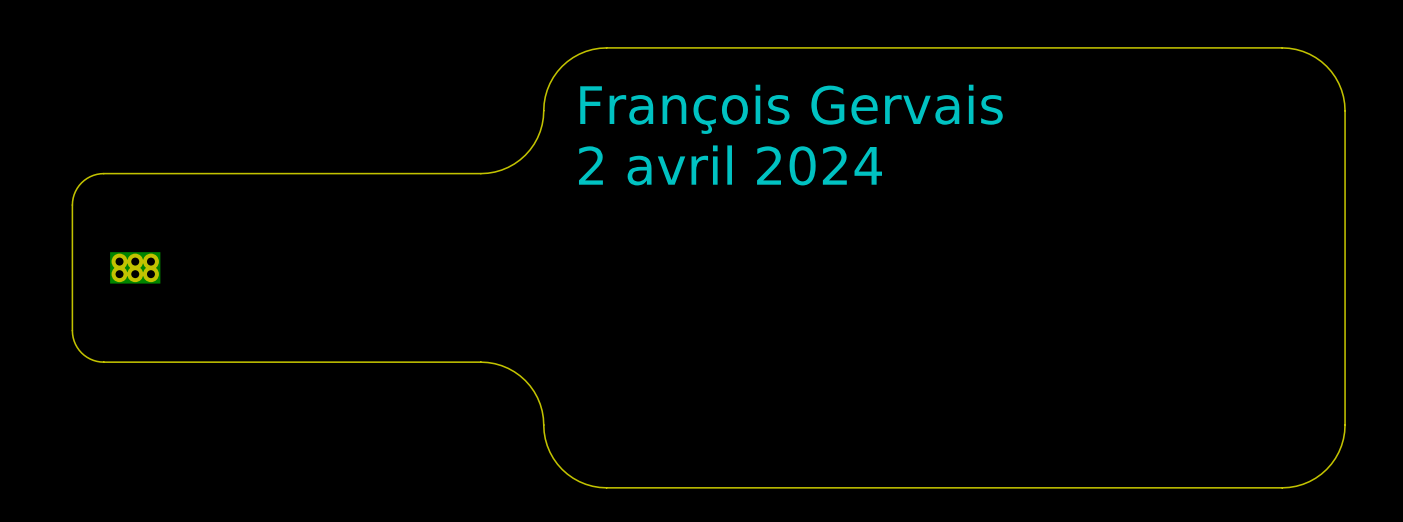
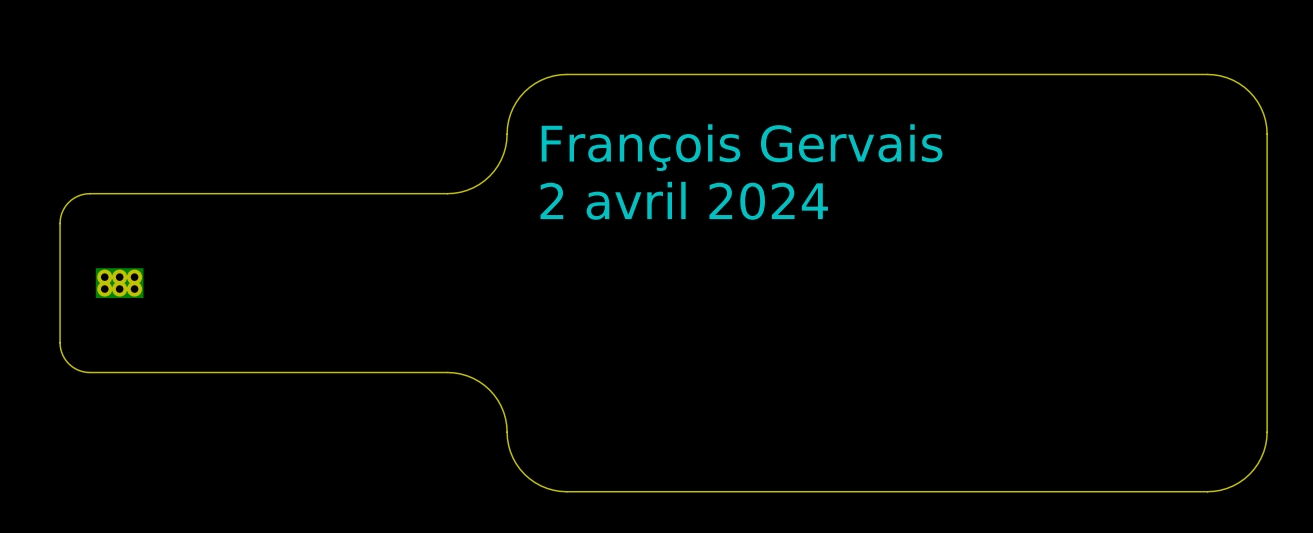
text position: François Gervais (791, 109) -> François Gervais (742, 147)
text position: 2 avril 2024 (730, 165) -> 2 avril 2024 (684, 200)

